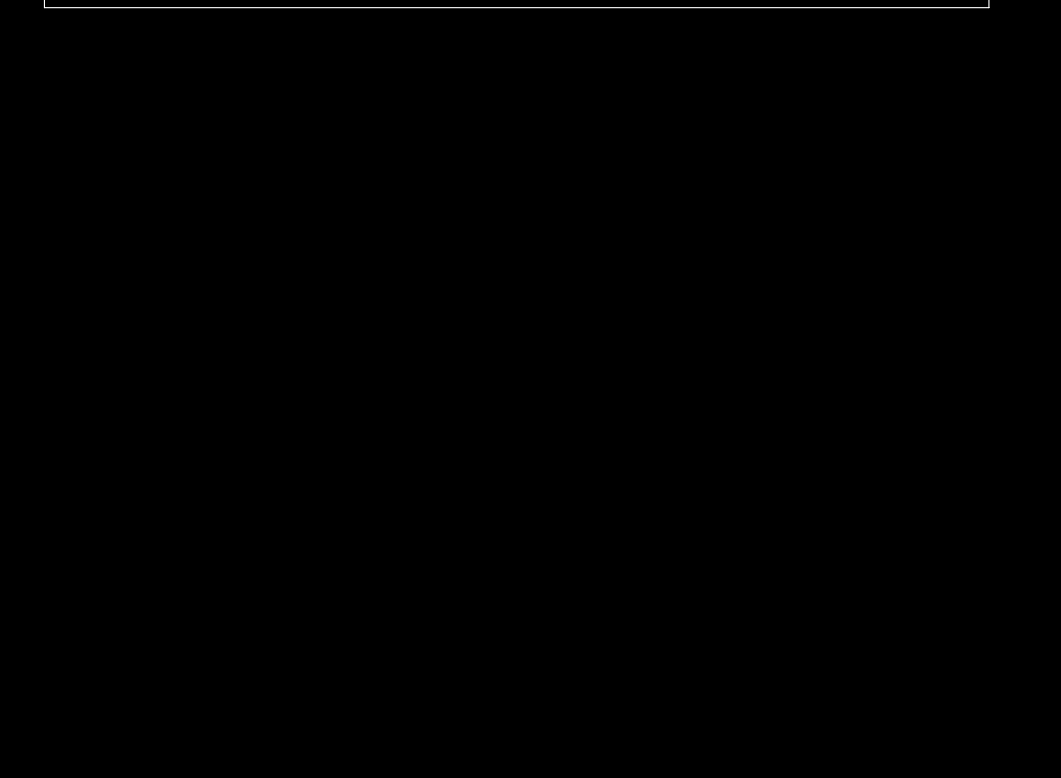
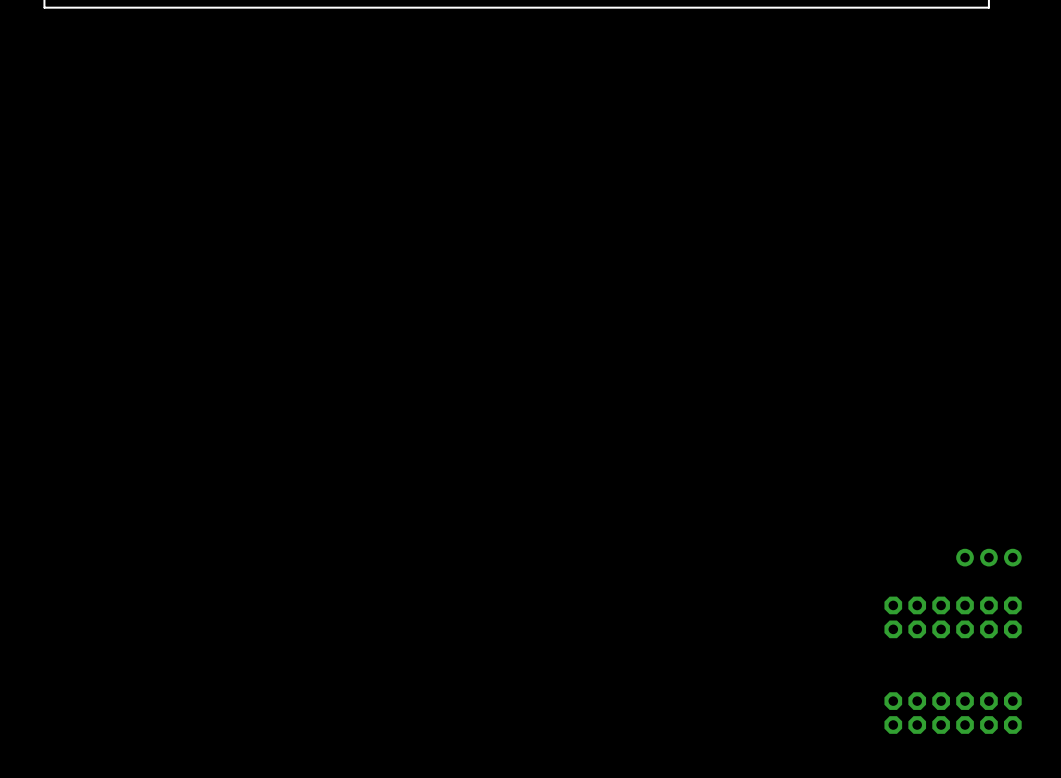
part: none -> (988, 557)
part: none -> (953, 617)
part: none -> (953, 713)

